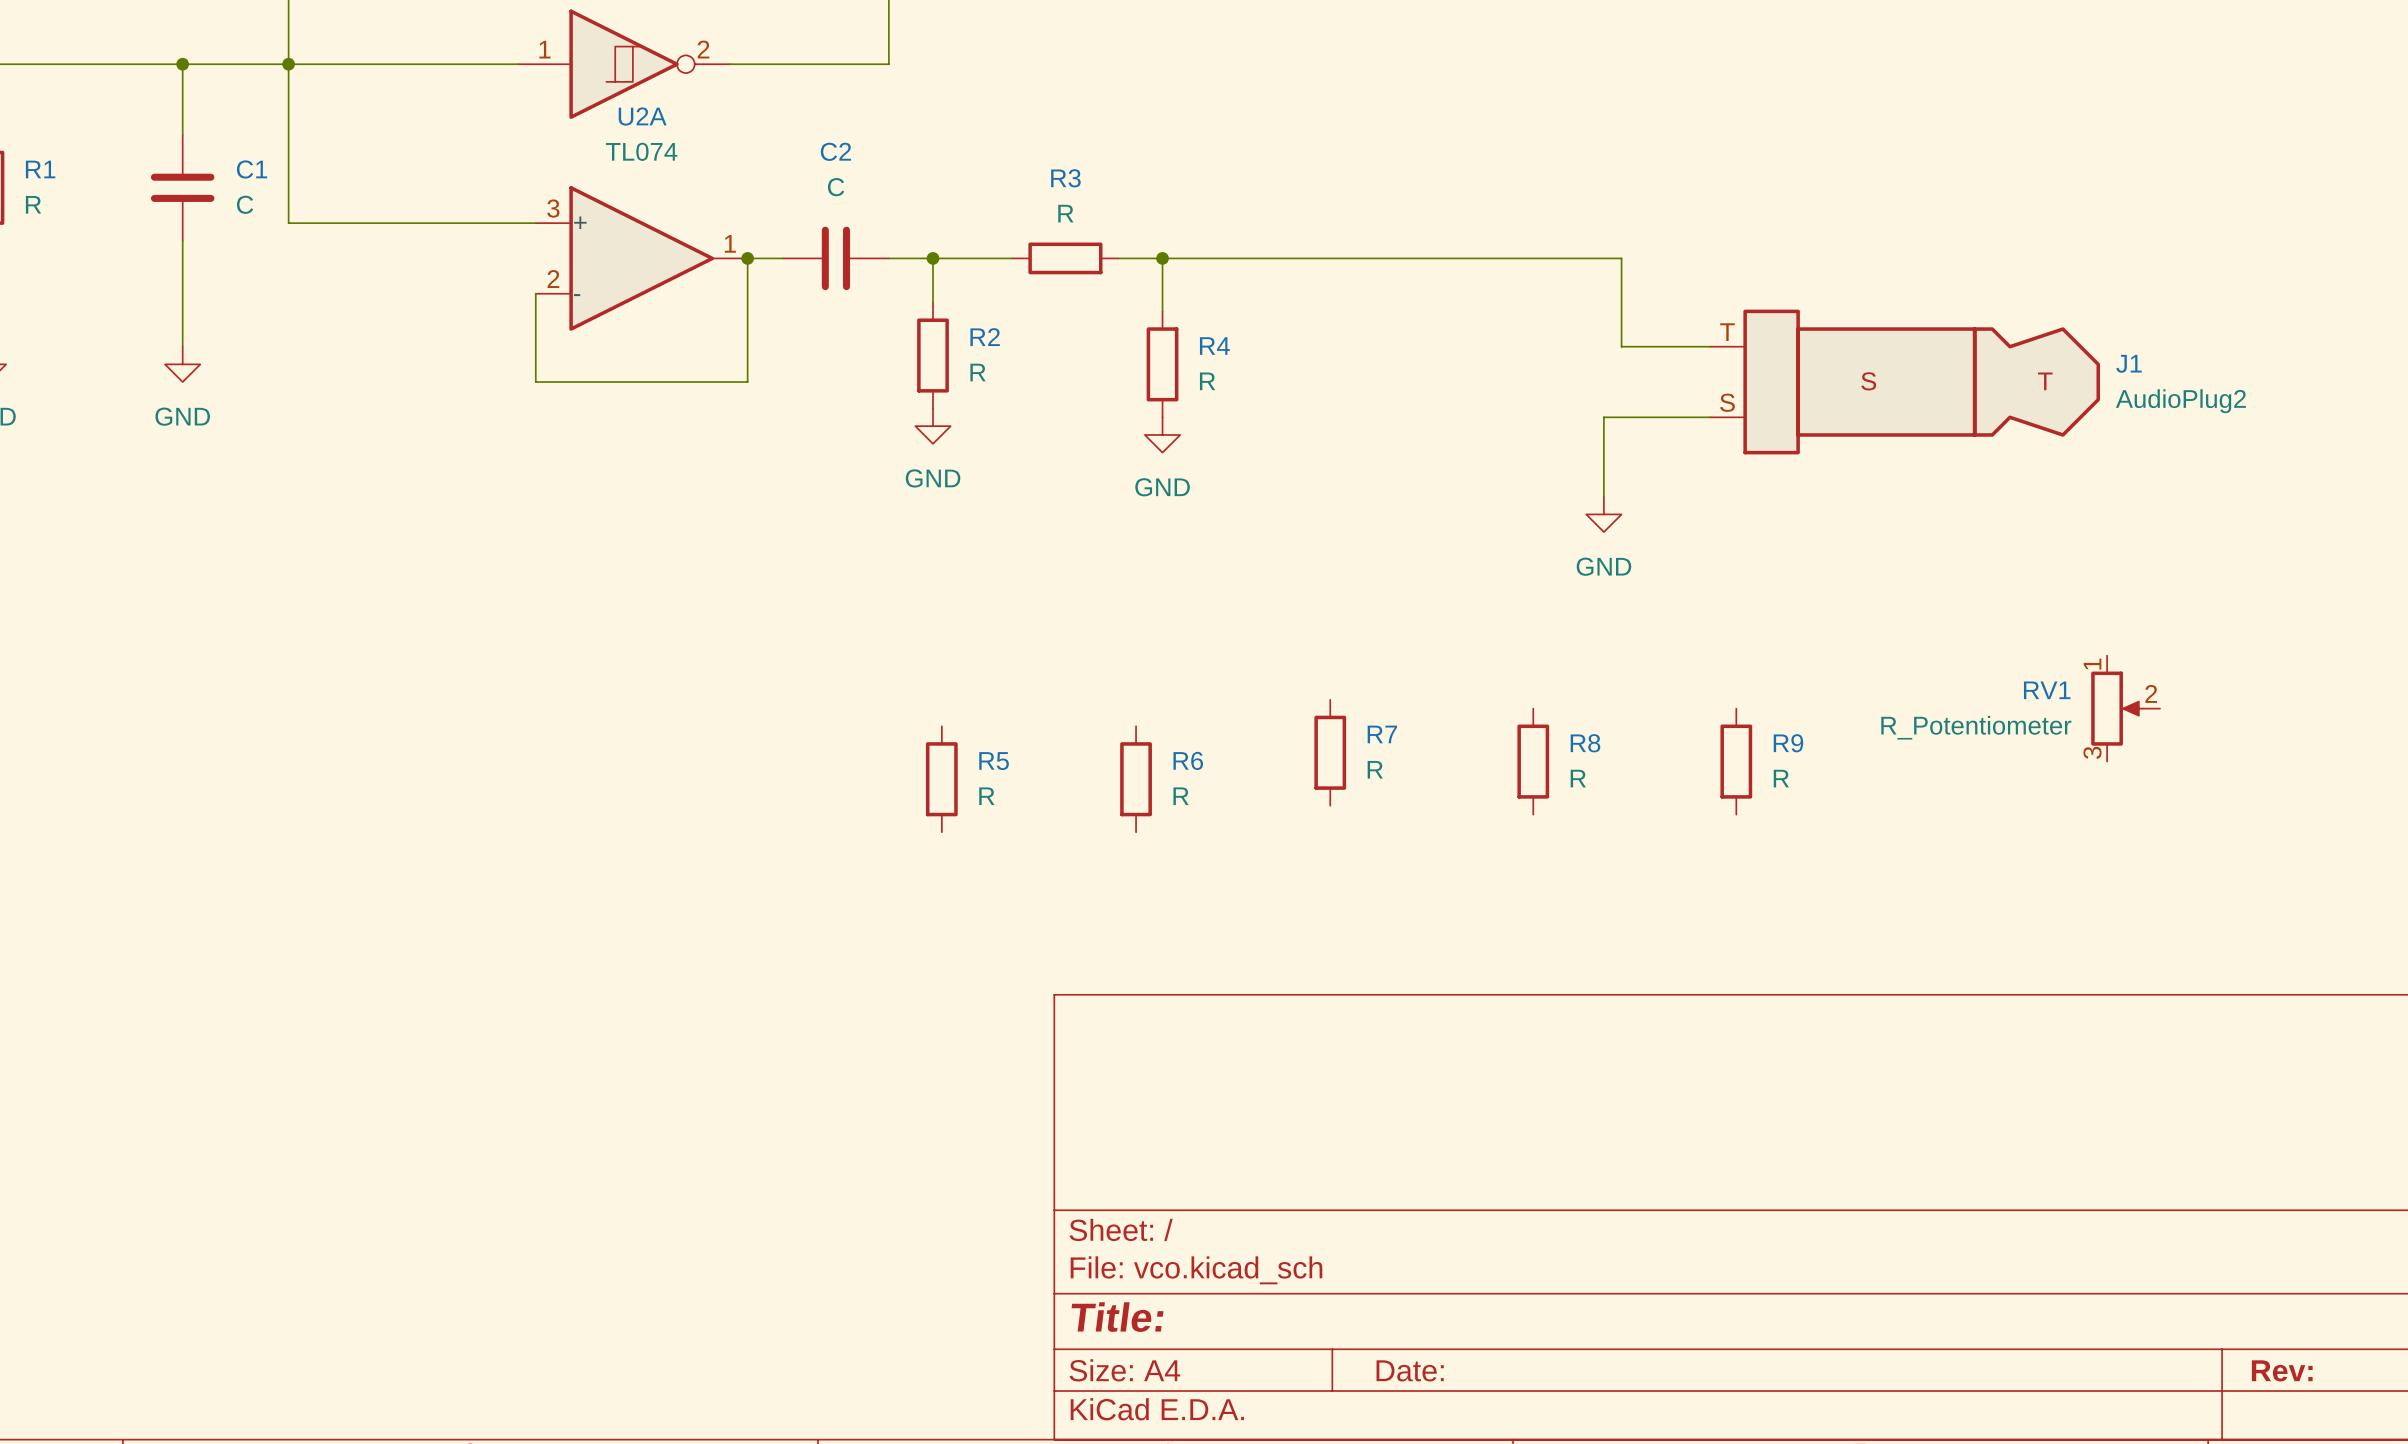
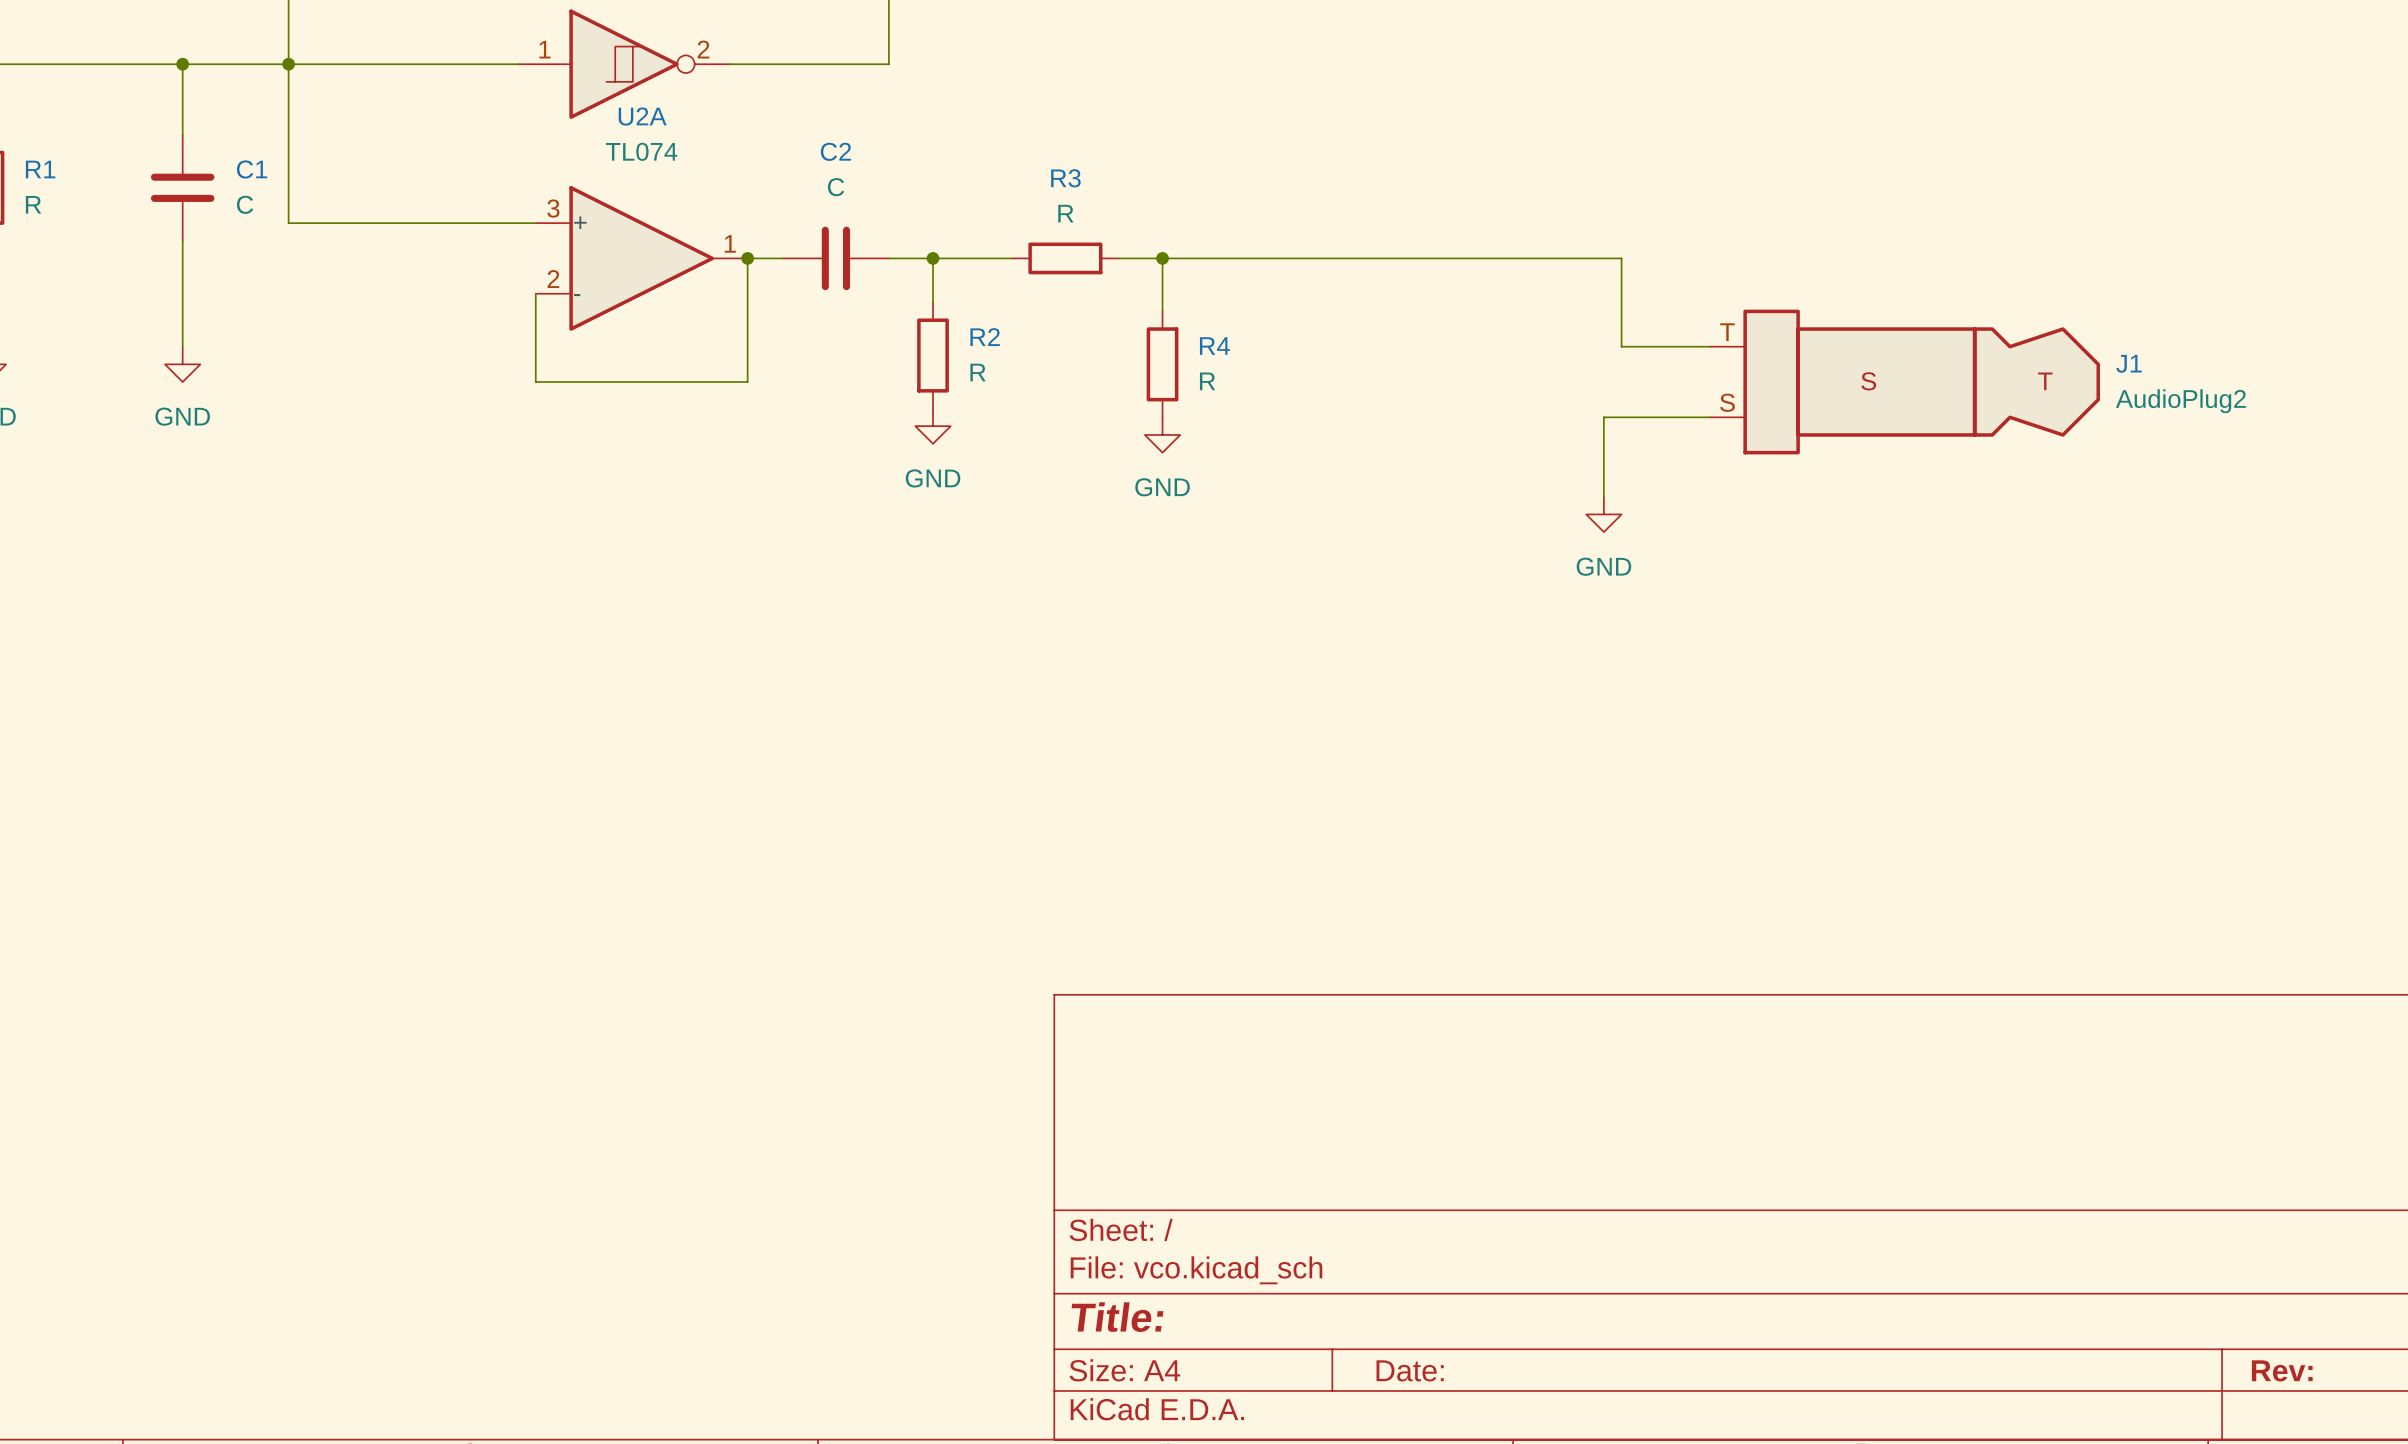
RV1: R_Potentiometer (2125, 708) -> none
R7: R (1330, 752) -> none
R8: R (1533, 761) -> none
R9: R (1736, 761) -> none
R5: R (941, 779) -> none
R6: R (1136, 779) -> none

